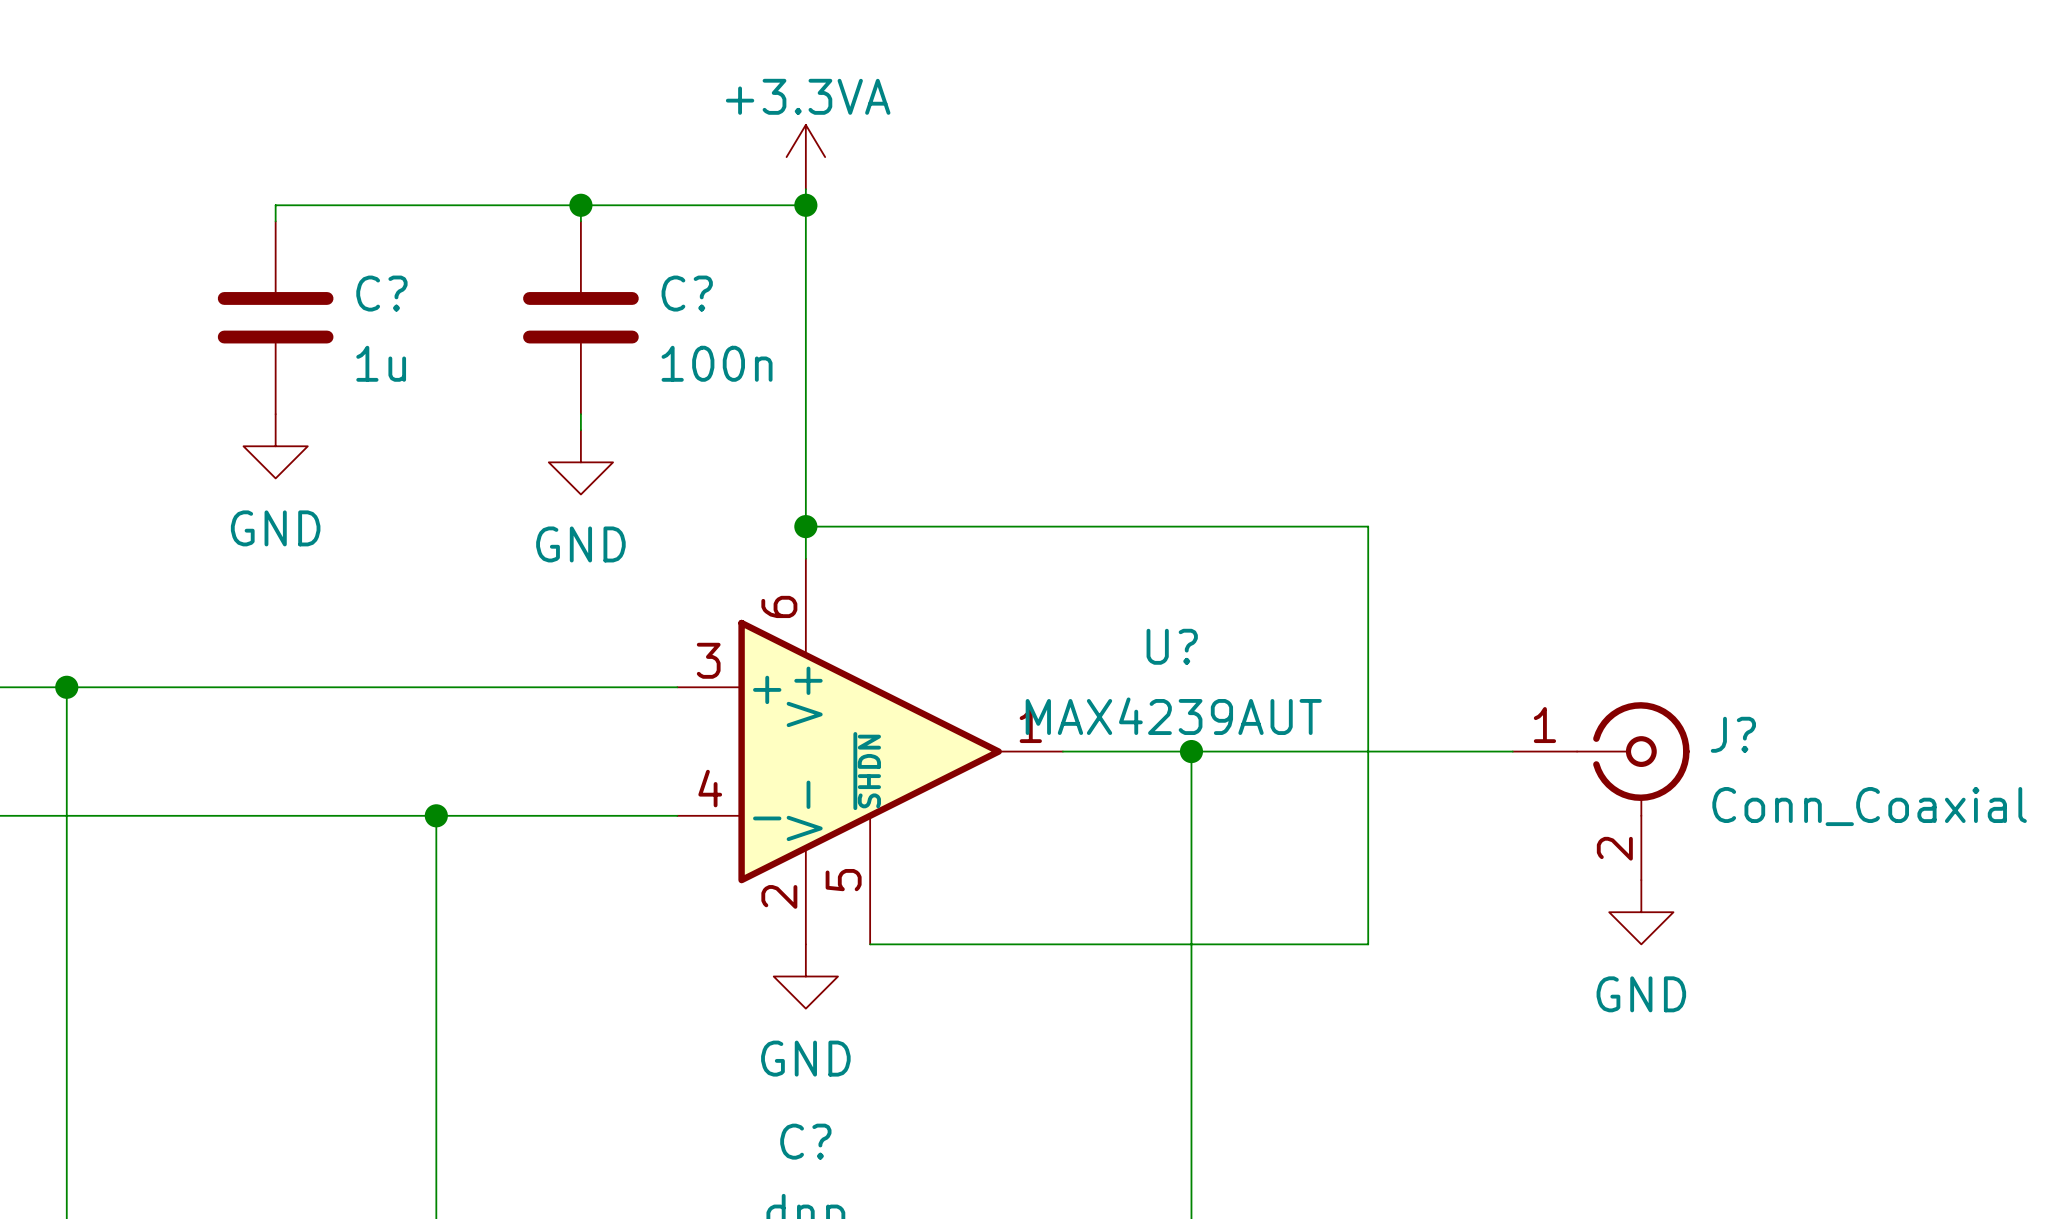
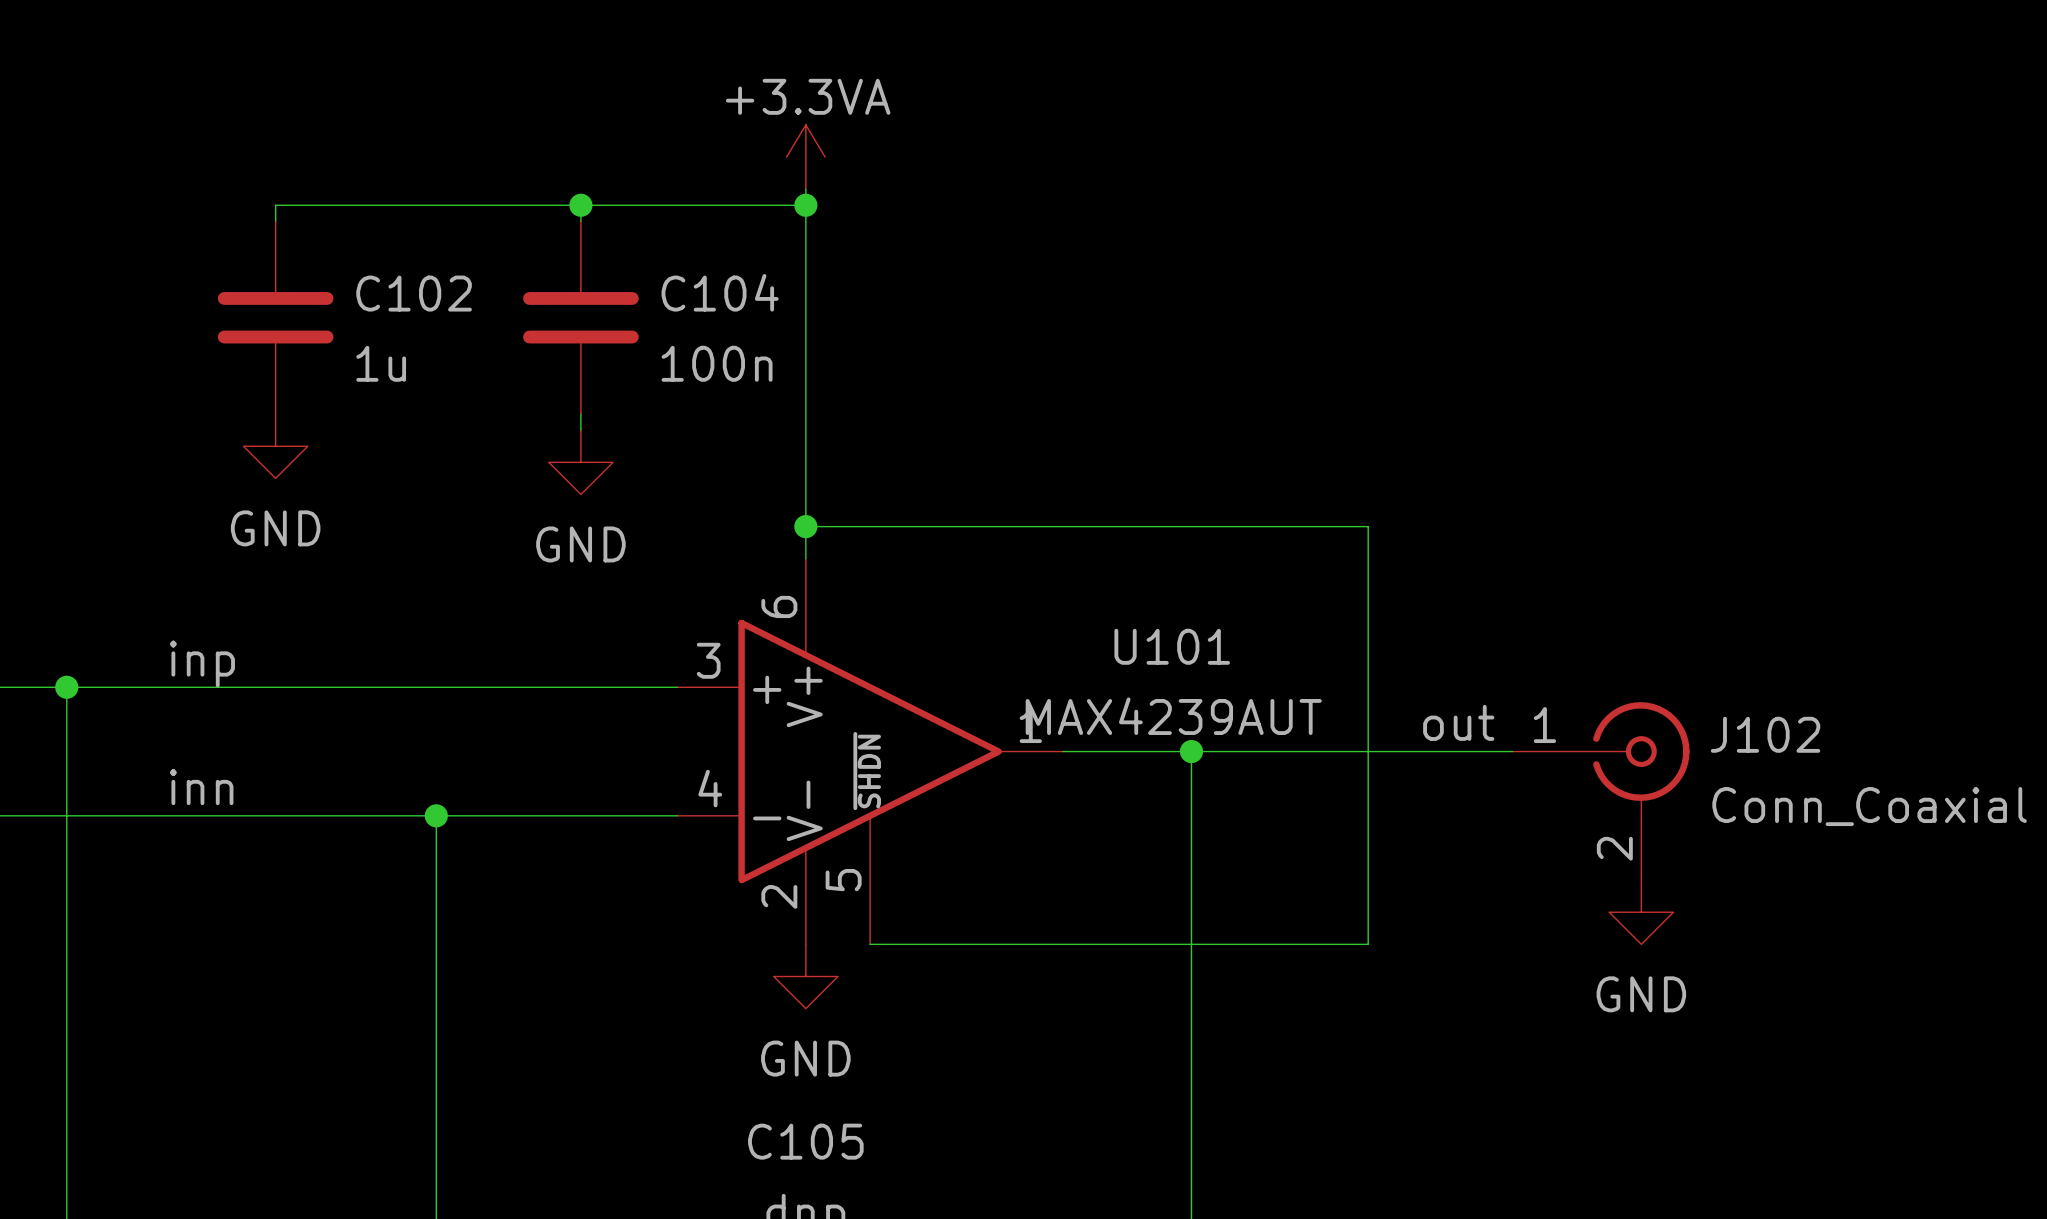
C? name: C? (381, 293) -> C102 (414, 293)
C? name: C? (687, 293) -> C104 (720, 292)
U? name: U? (1172, 646) -> U101 (1172, 646)
label: none -> inp (202, 663)
label: none -> out (1458, 722)
J? name: J? (1733, 734) -> J102 (1765, 734)
label: none -> inn (201, 787)
C? name: C? (805, 1141) -> C105 (805, 1141)

